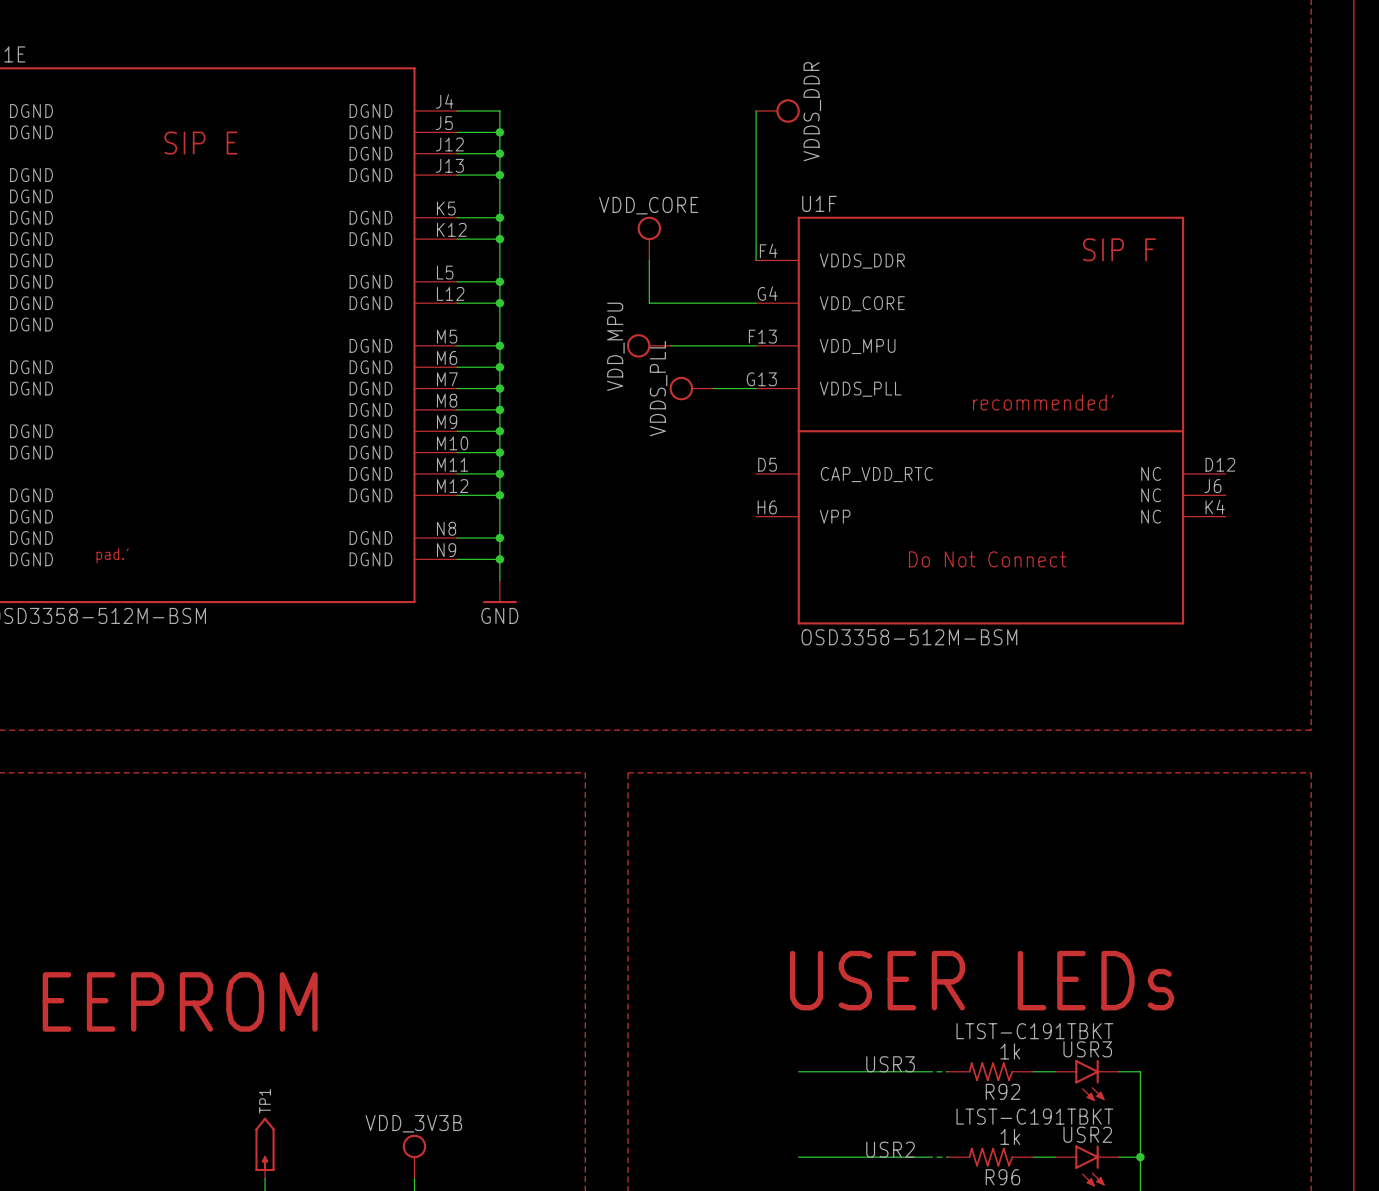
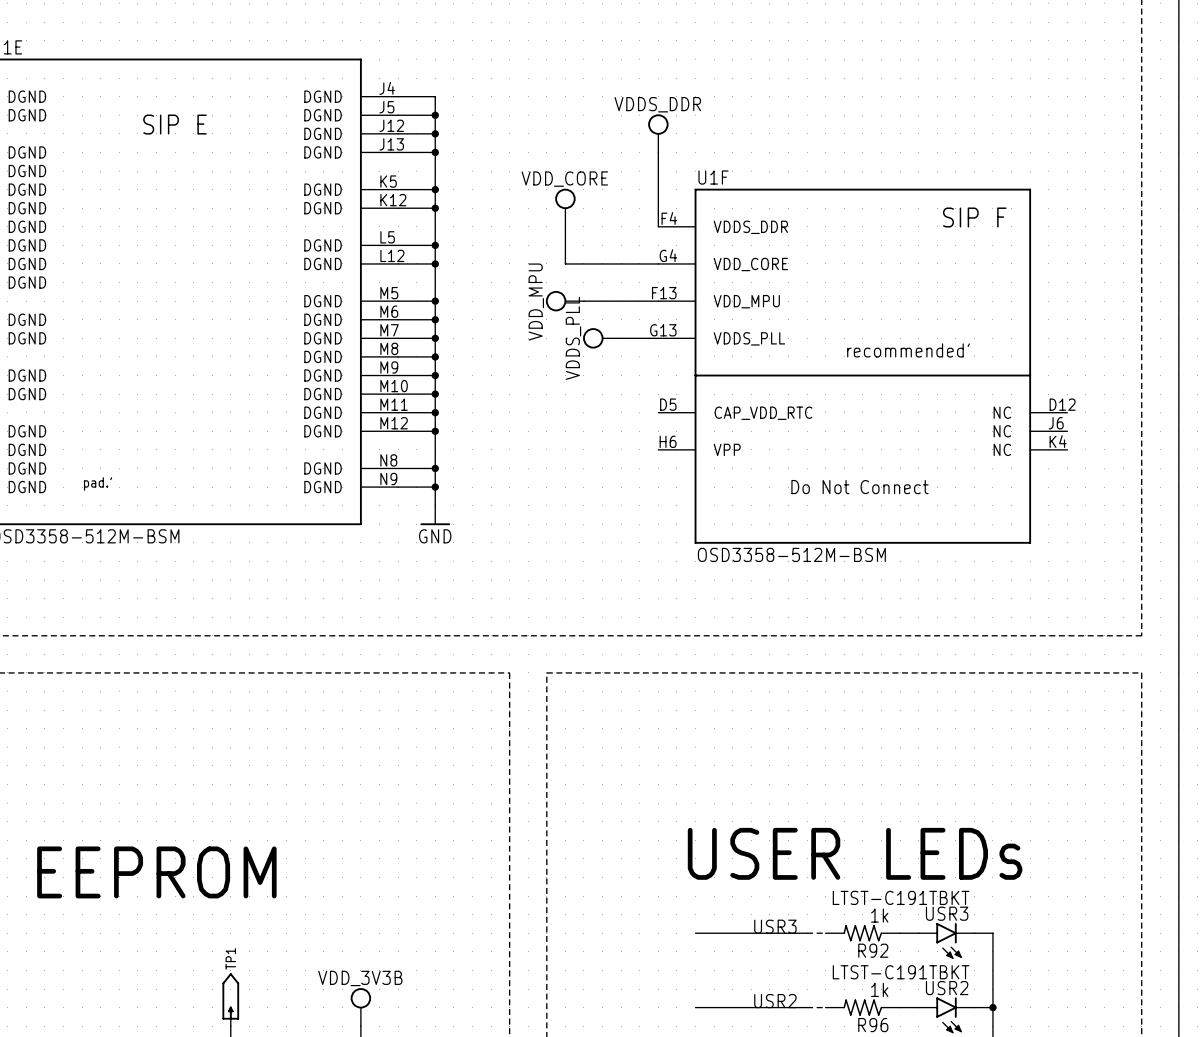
wire: (756, 111) (756, 175) -> none
power symbol position: VDDS_DDR (777, 111) -> VDDS_DDR (658, 133)
power symbol rotation: 0° (788, 111) -> 90° counterclockwise (658, 124)

